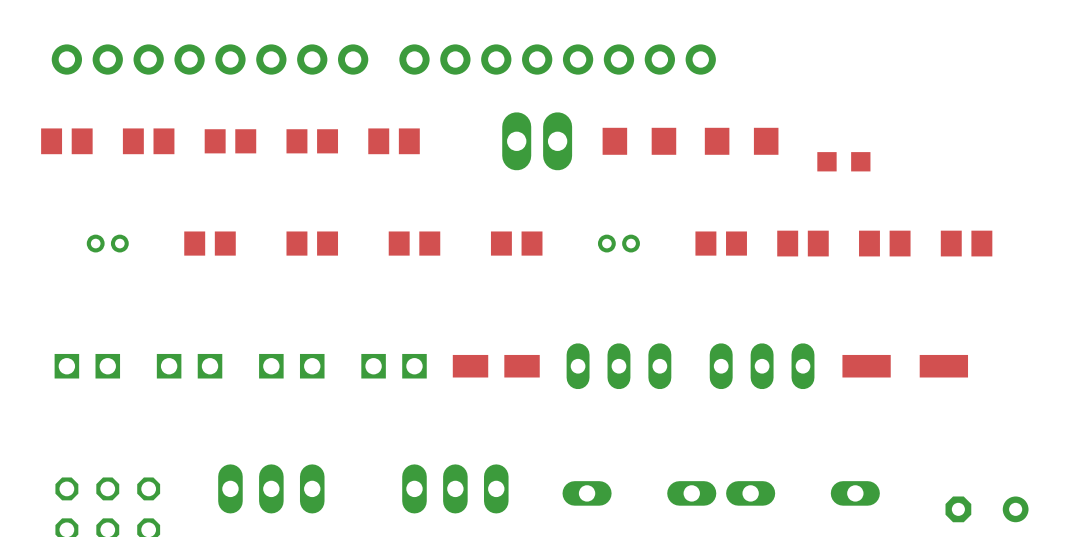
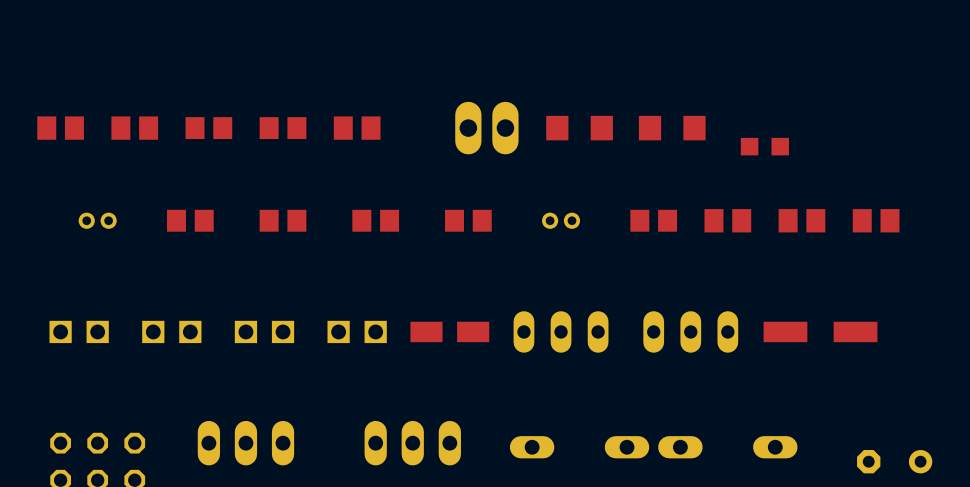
part: (210, 59) -> none
part: (557, 59) -> none

